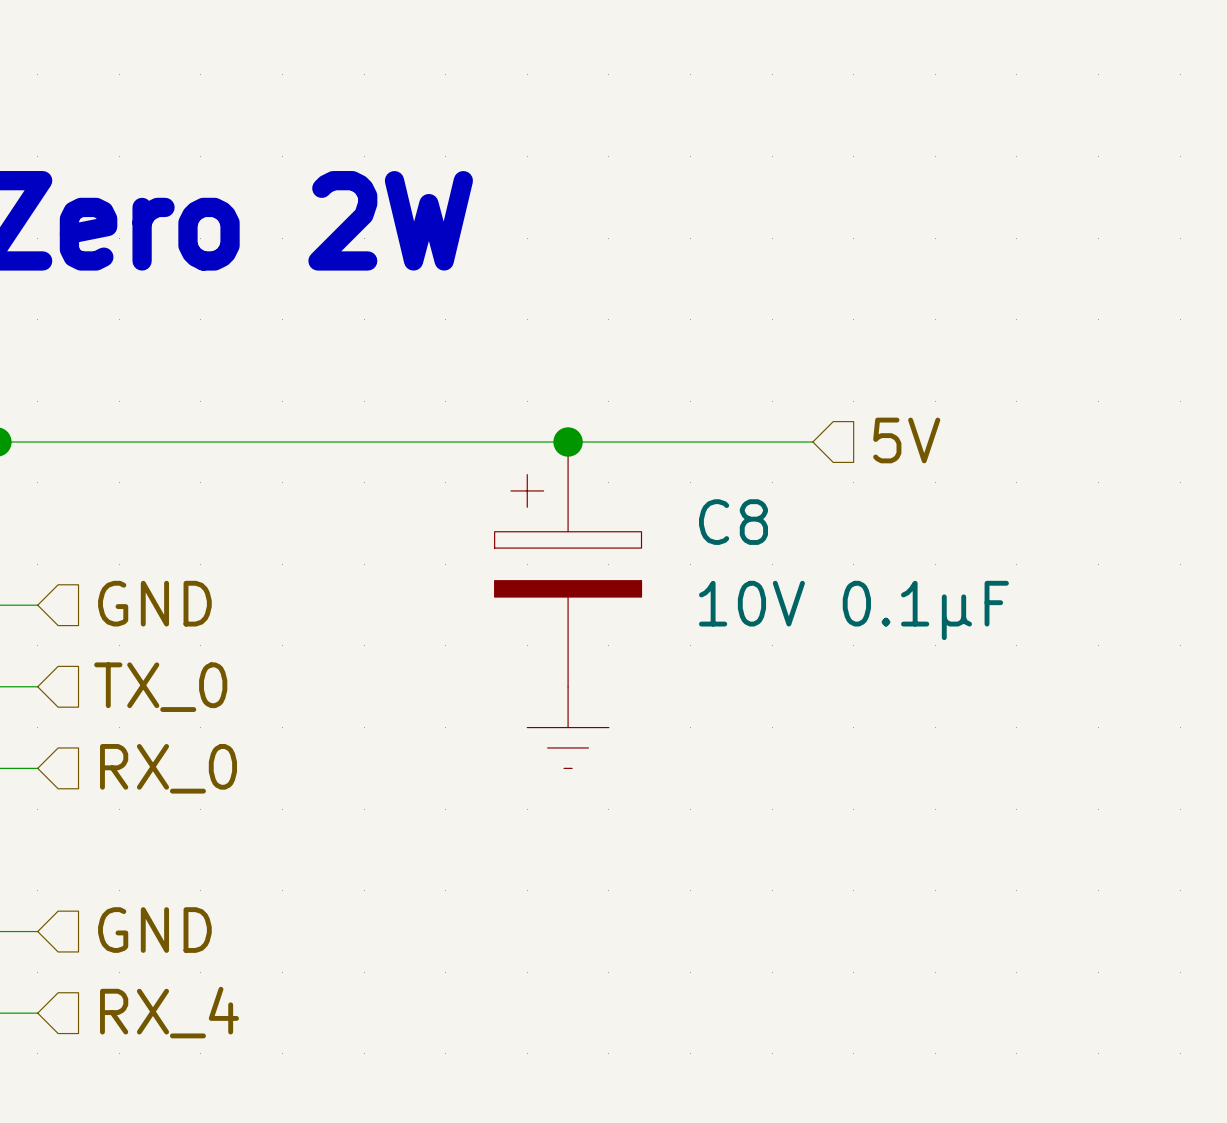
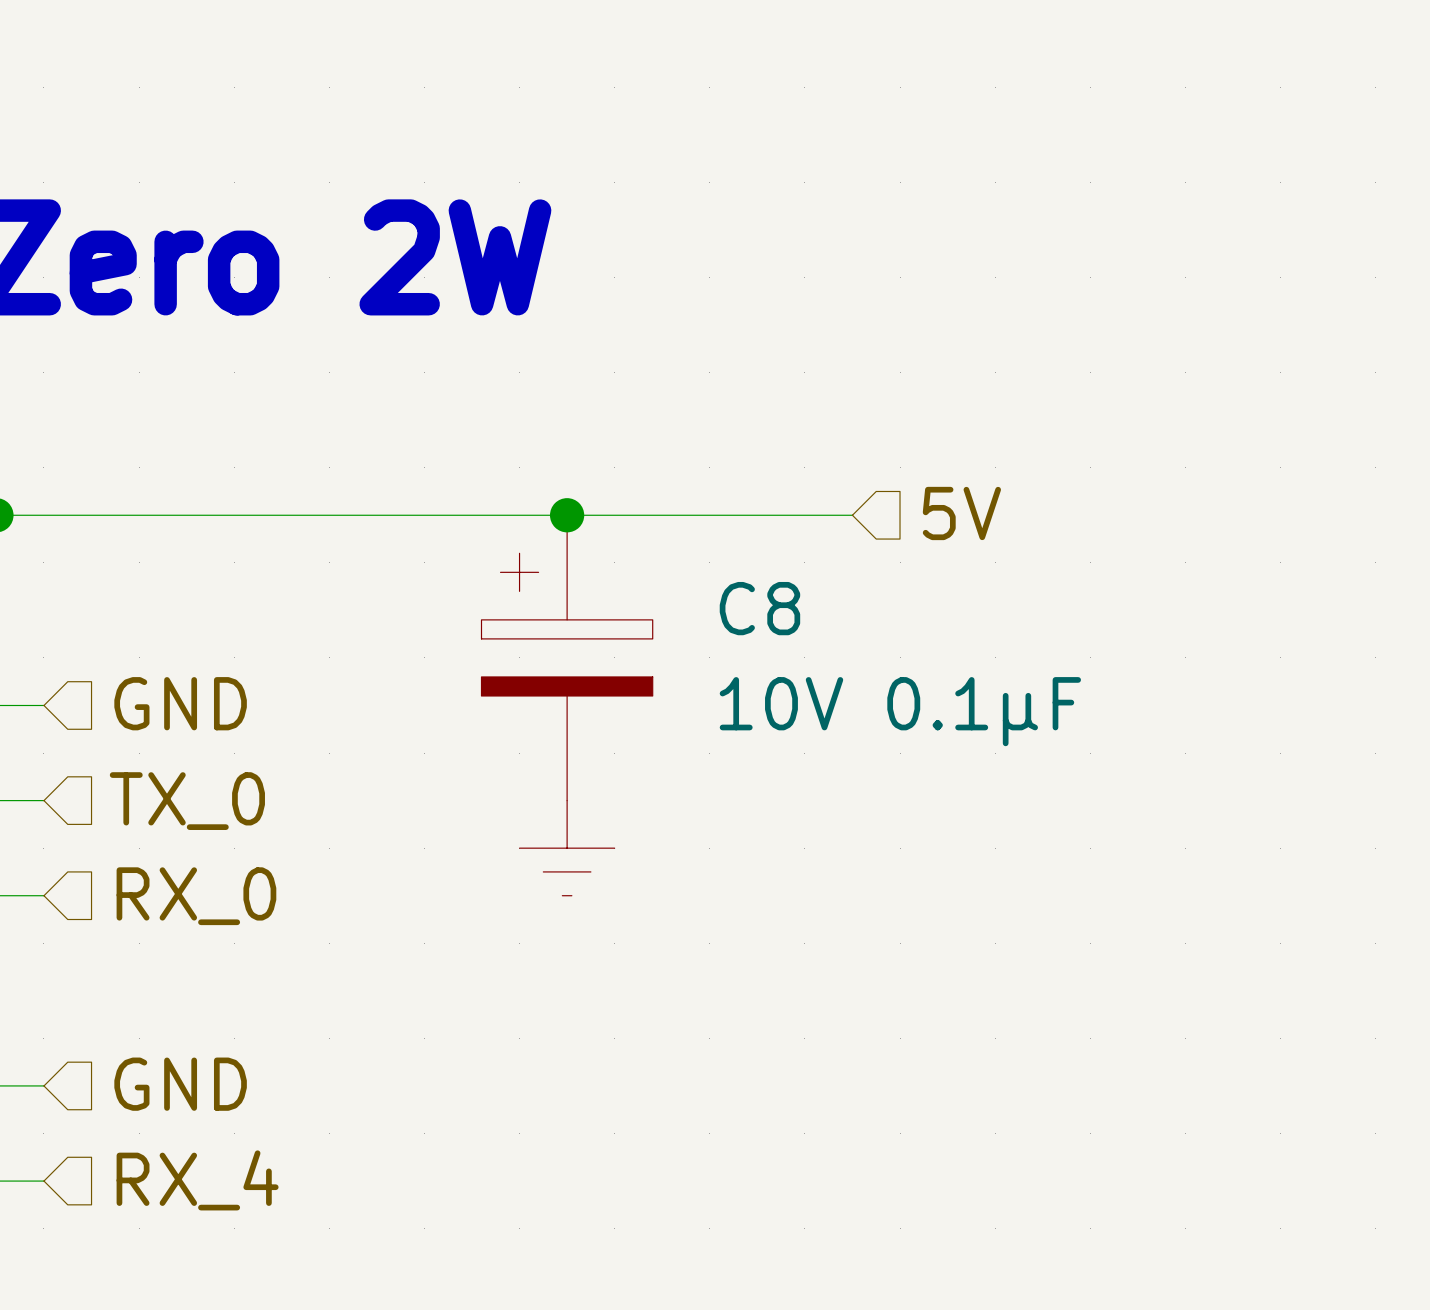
hierarchical label position: 5V (906, 440) -> 5V (961, 513)
junction position: (568, 442) -> (567, 515)
wire: (731, 442) (812, 442) -> none
C8 position: (568, 564) -> (567, 657)
power symbol position: (568, 727) -> (567, 848)

